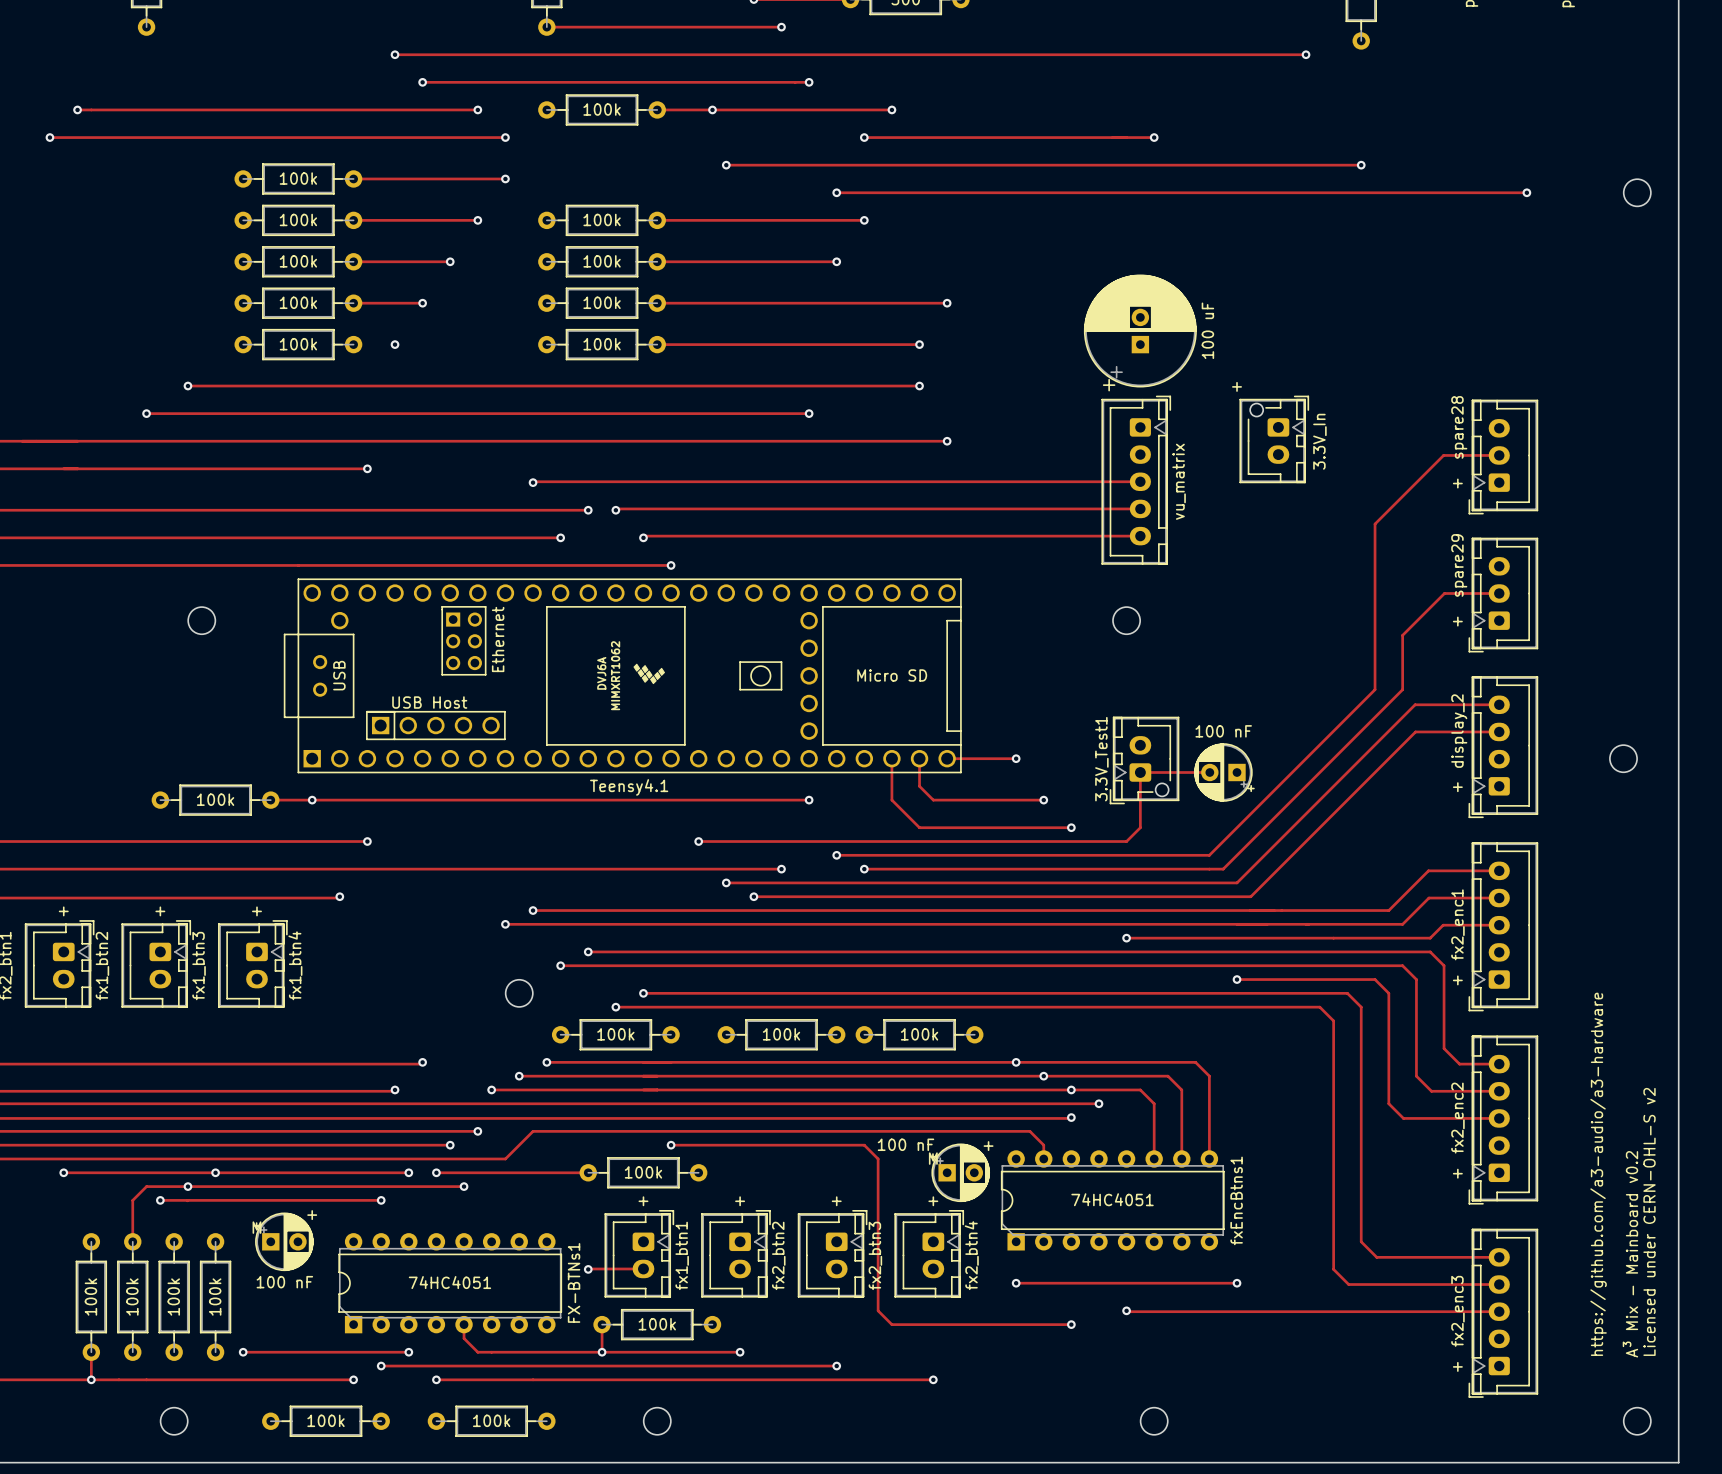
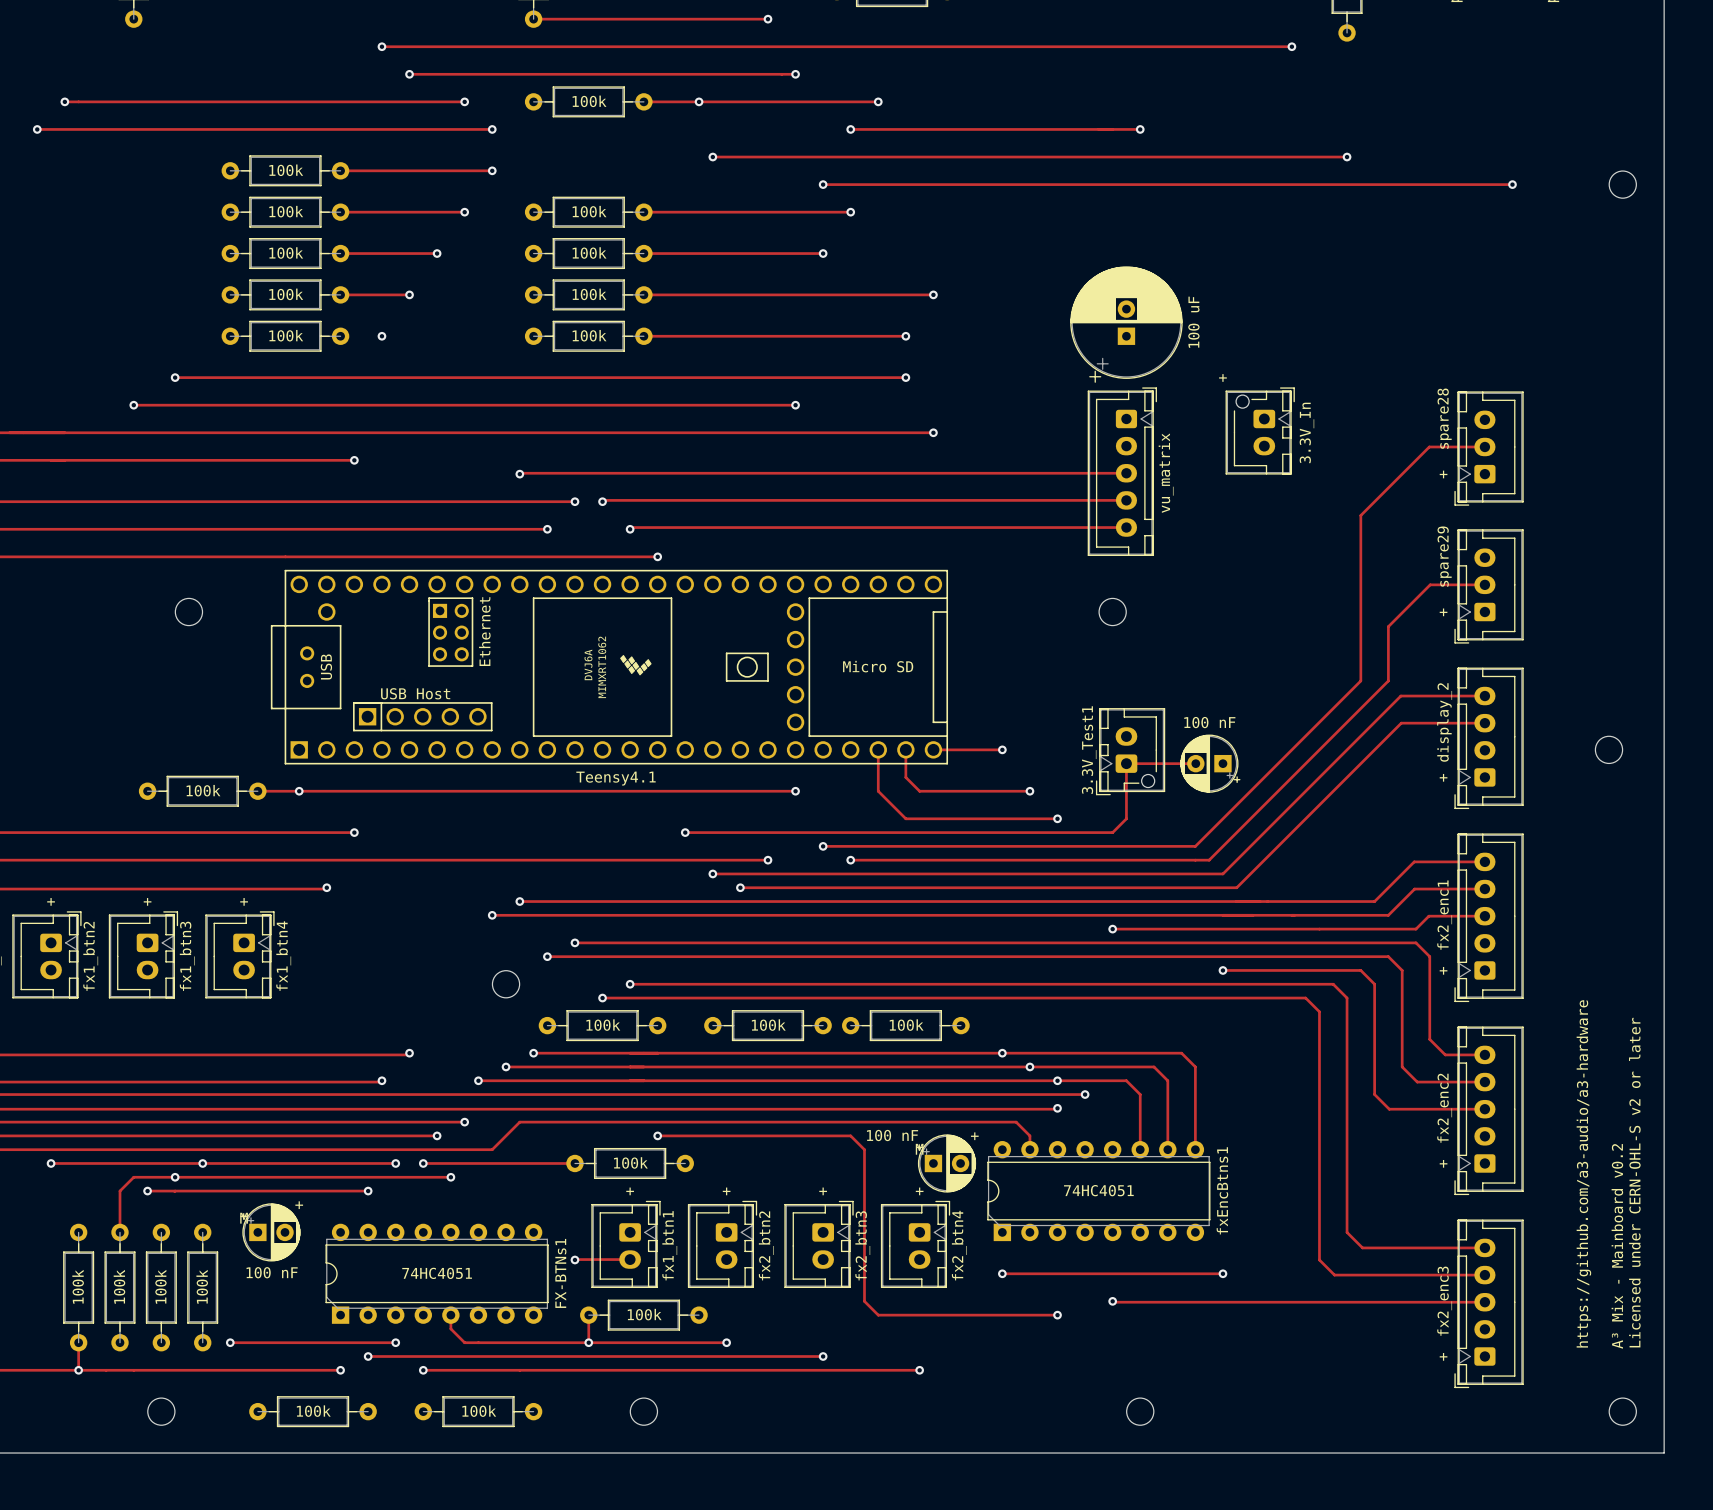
text: Licensed under CERN-OHL-S v2 (1649, 1221) -> Licensed under CERN-OHL-S v2 or later (1634, 1182)

